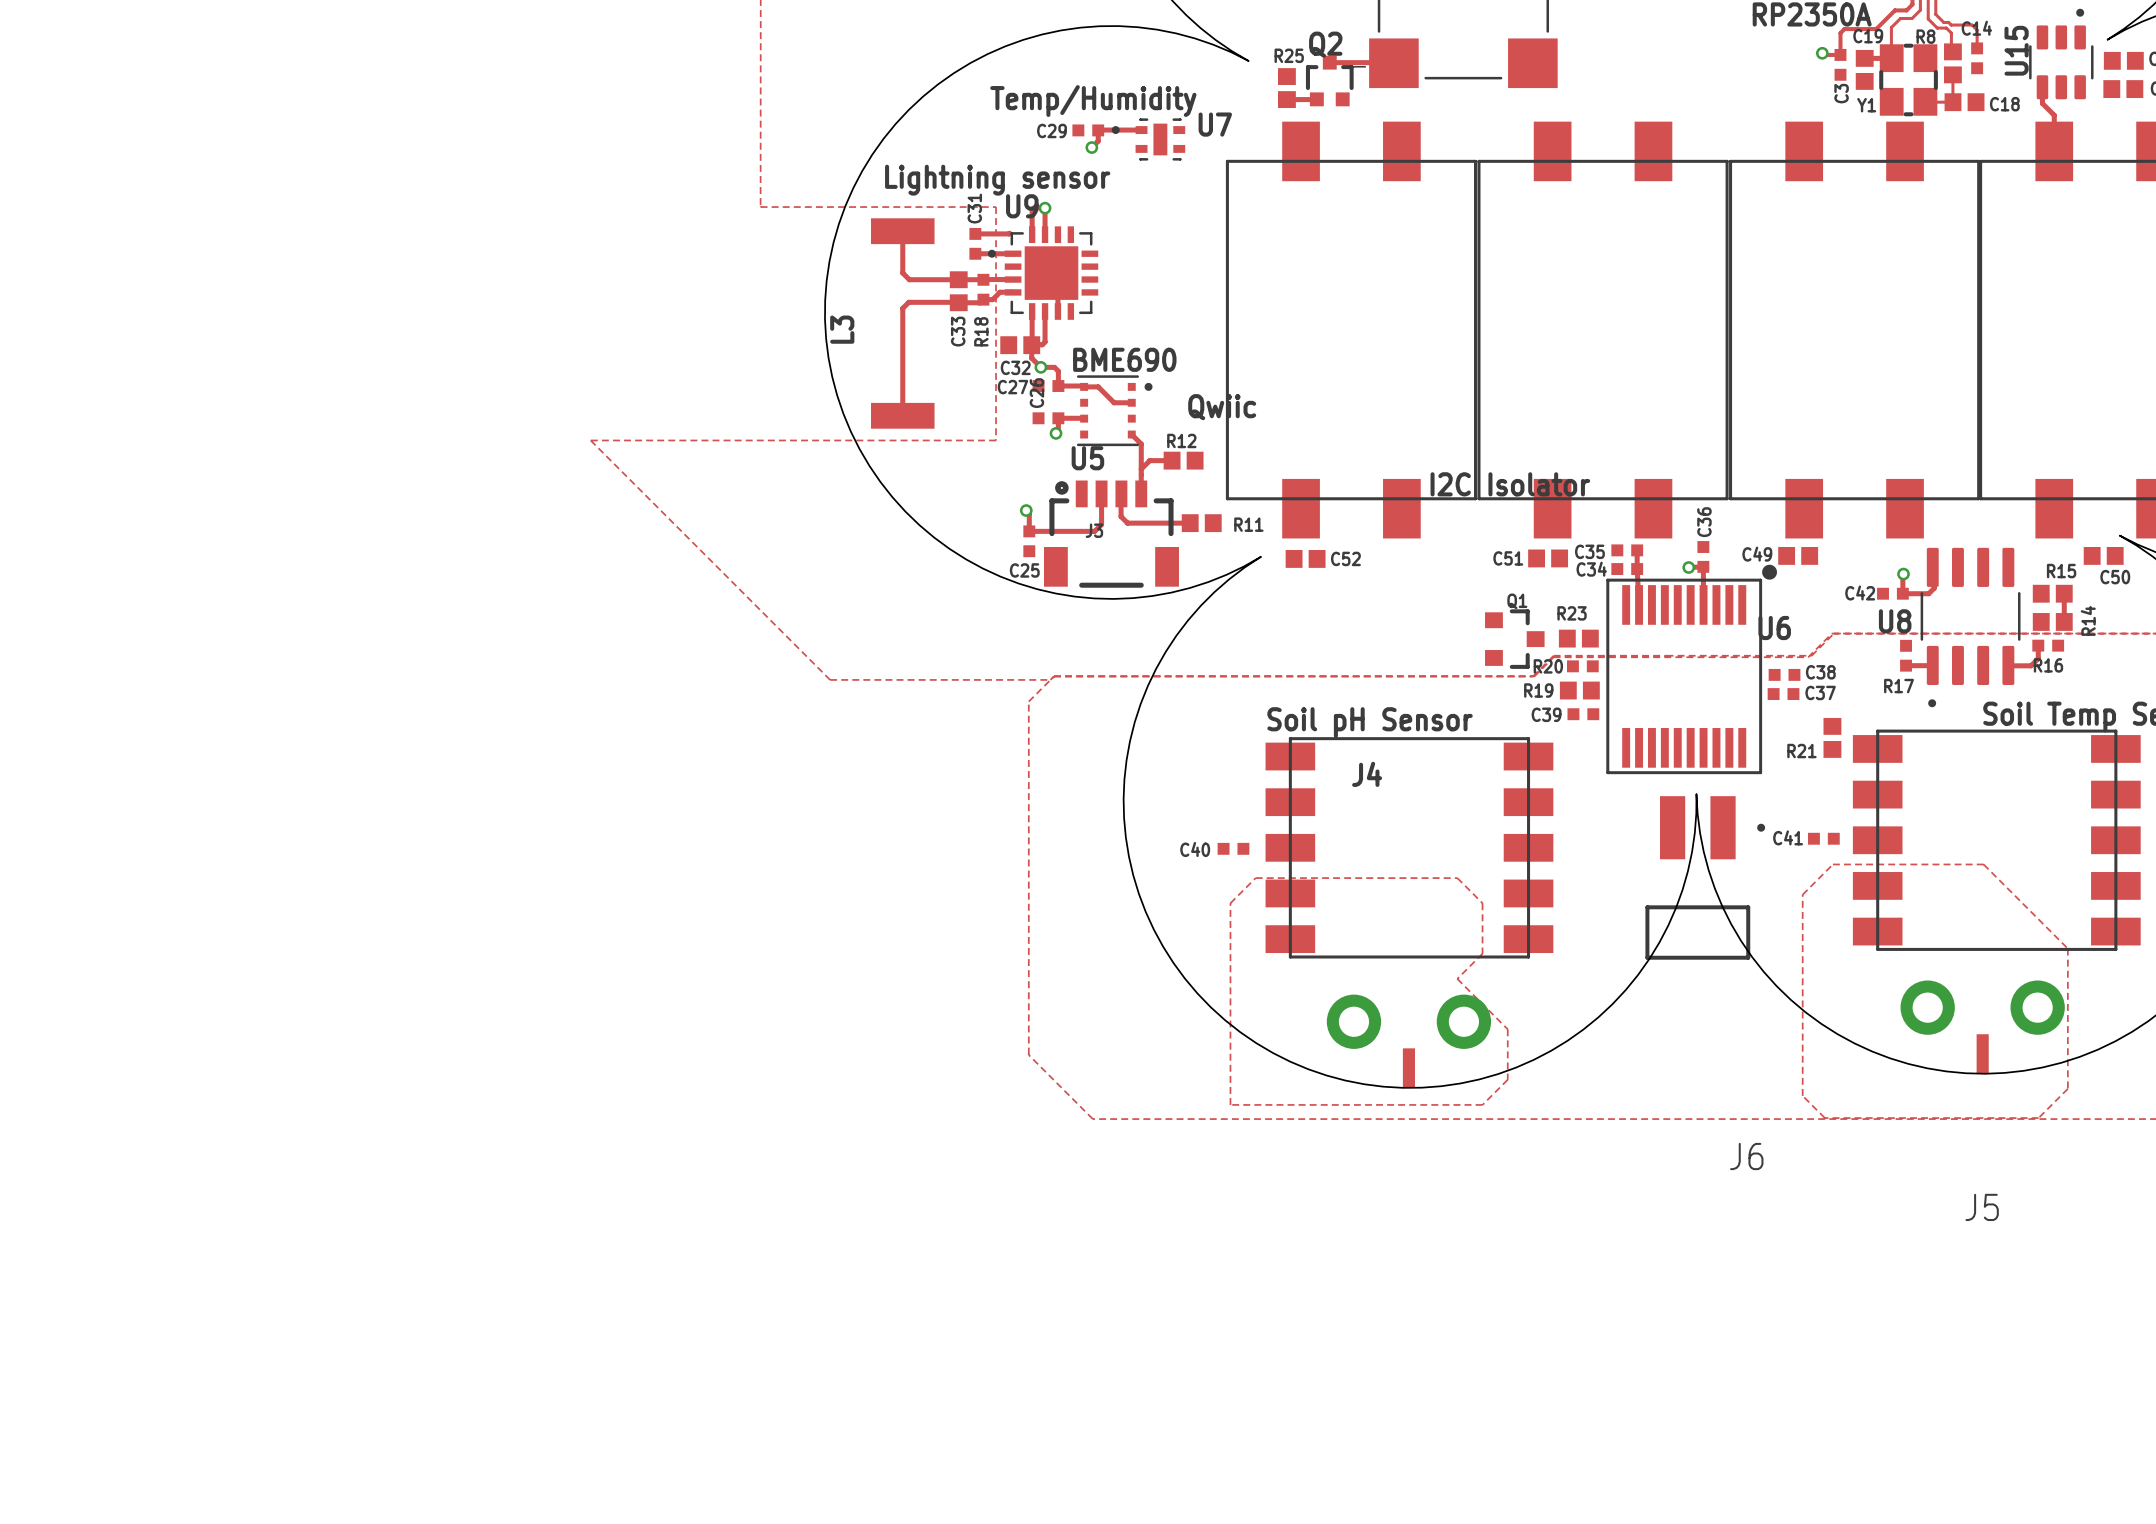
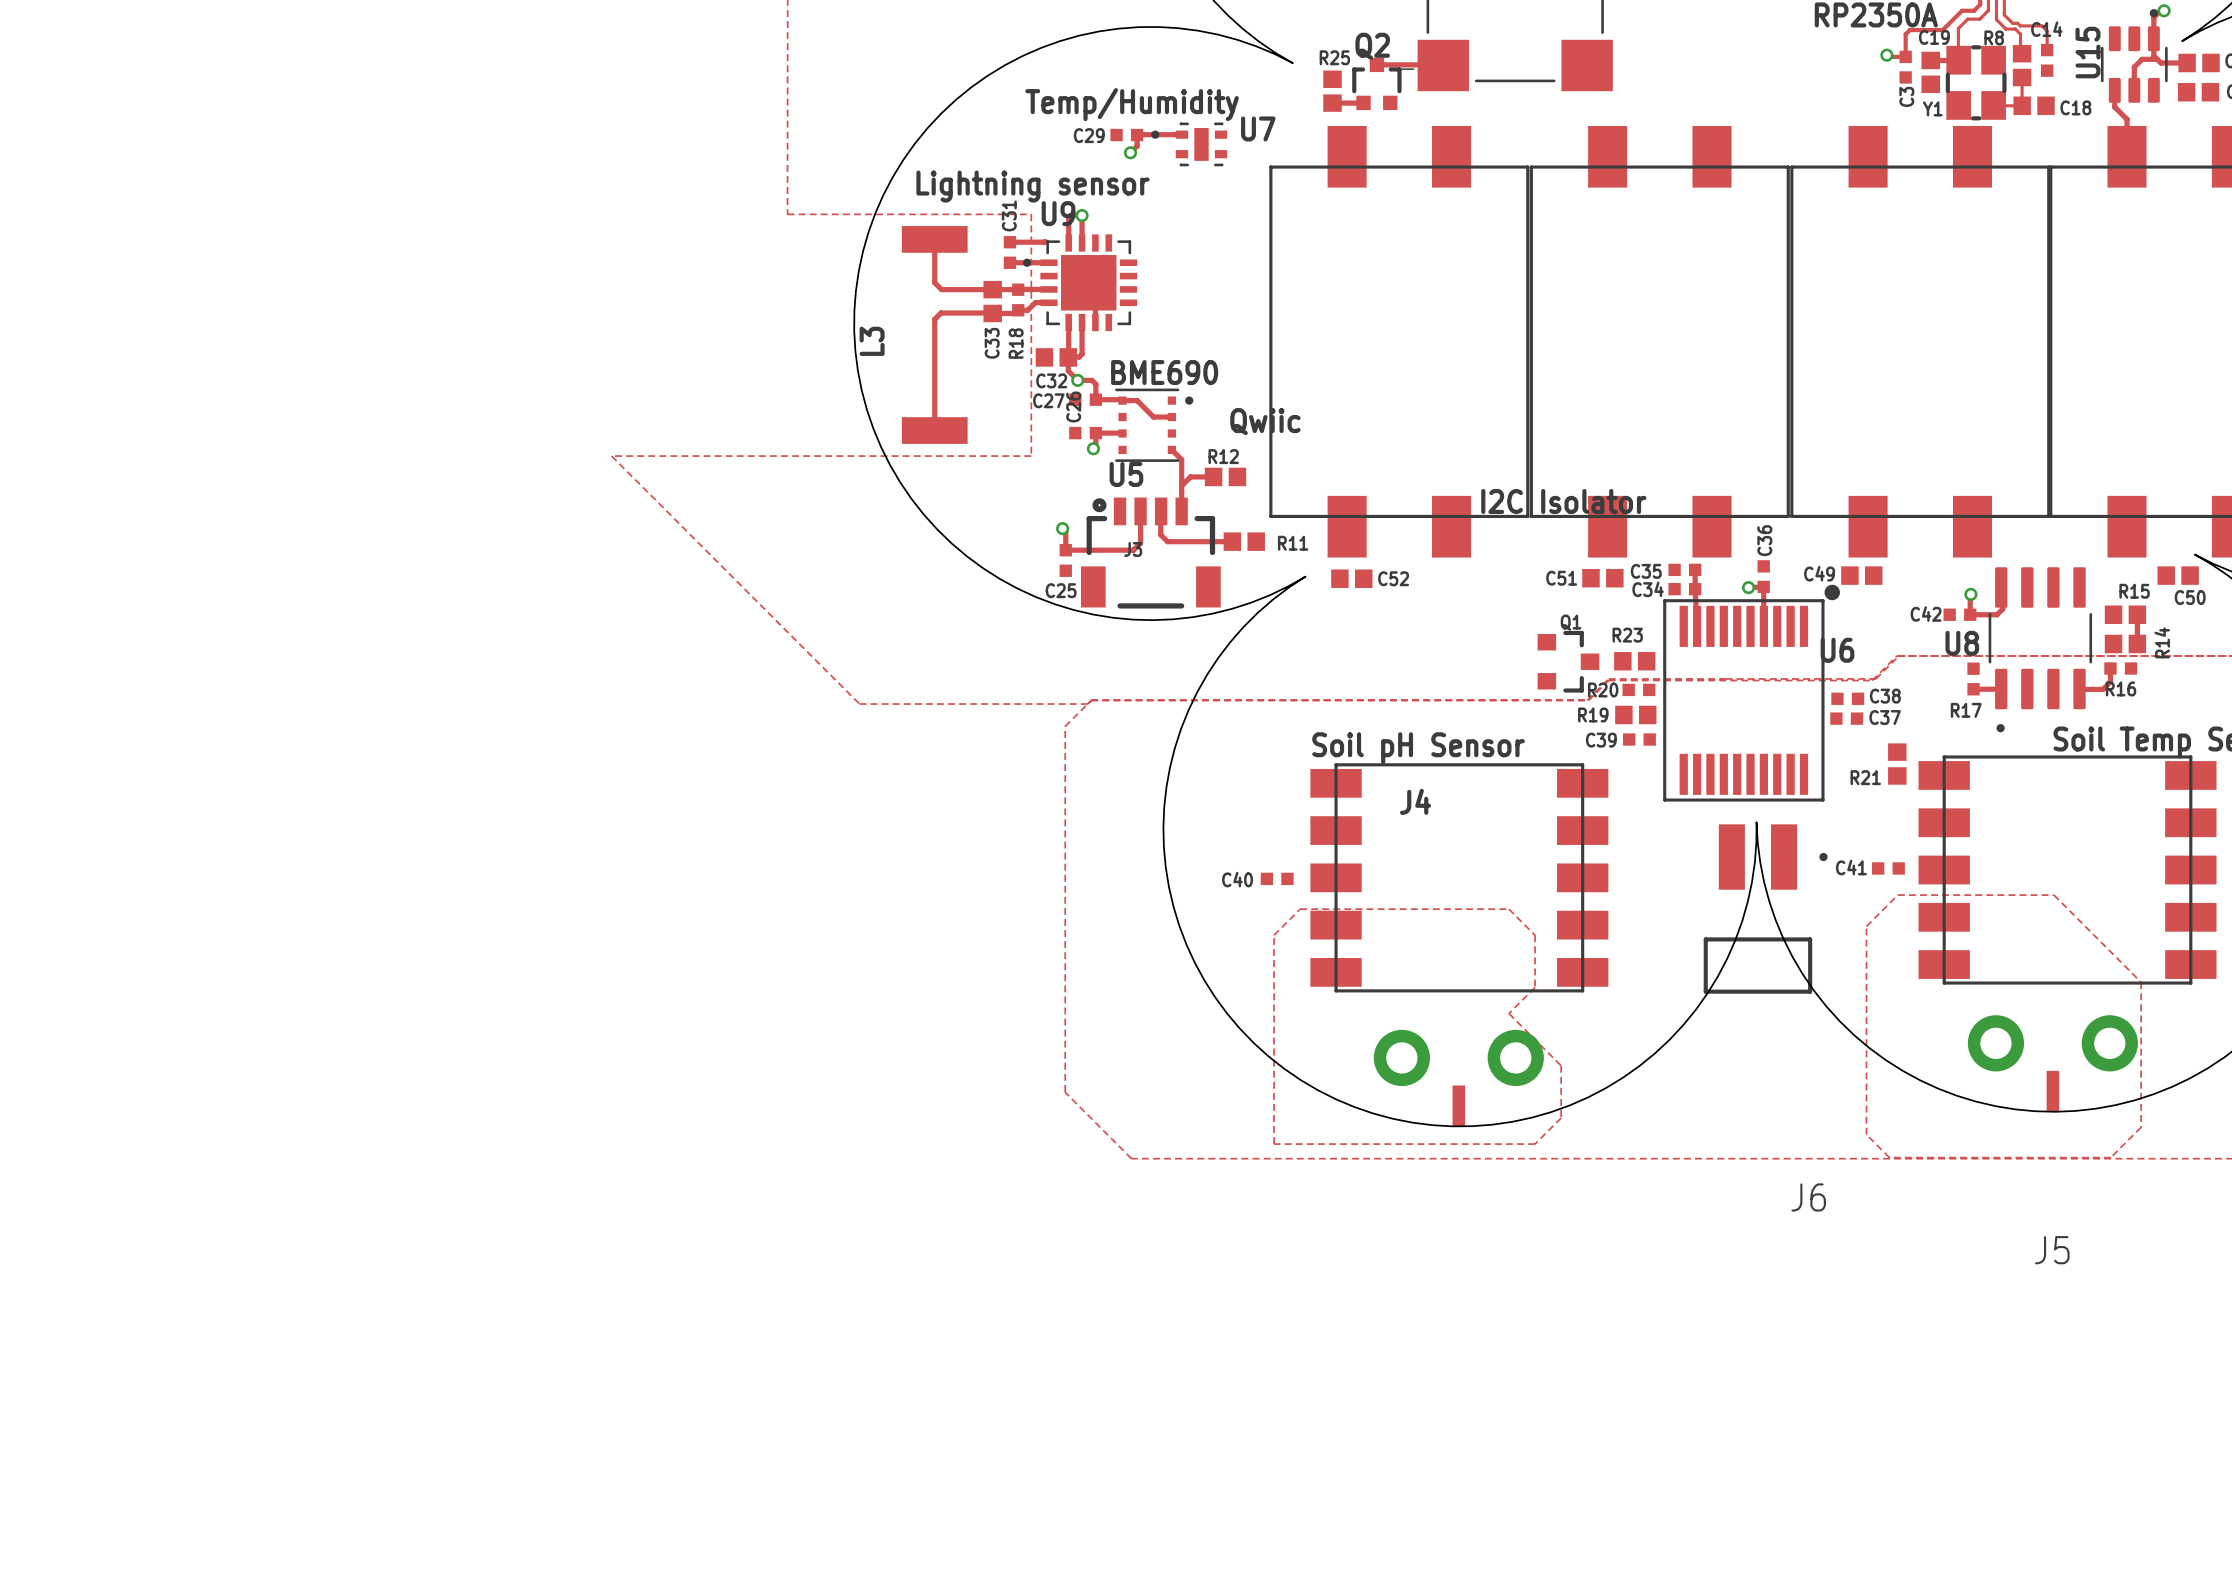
track: none -> (2164, 10) (2160, 10) (2153, 17) (2153, 55) (2160, 62) (2187, 62)
via: none -> (2164, 10)
track: none -> (2157, 59) (2142, 59) (2134, 67) (2134, 90)

